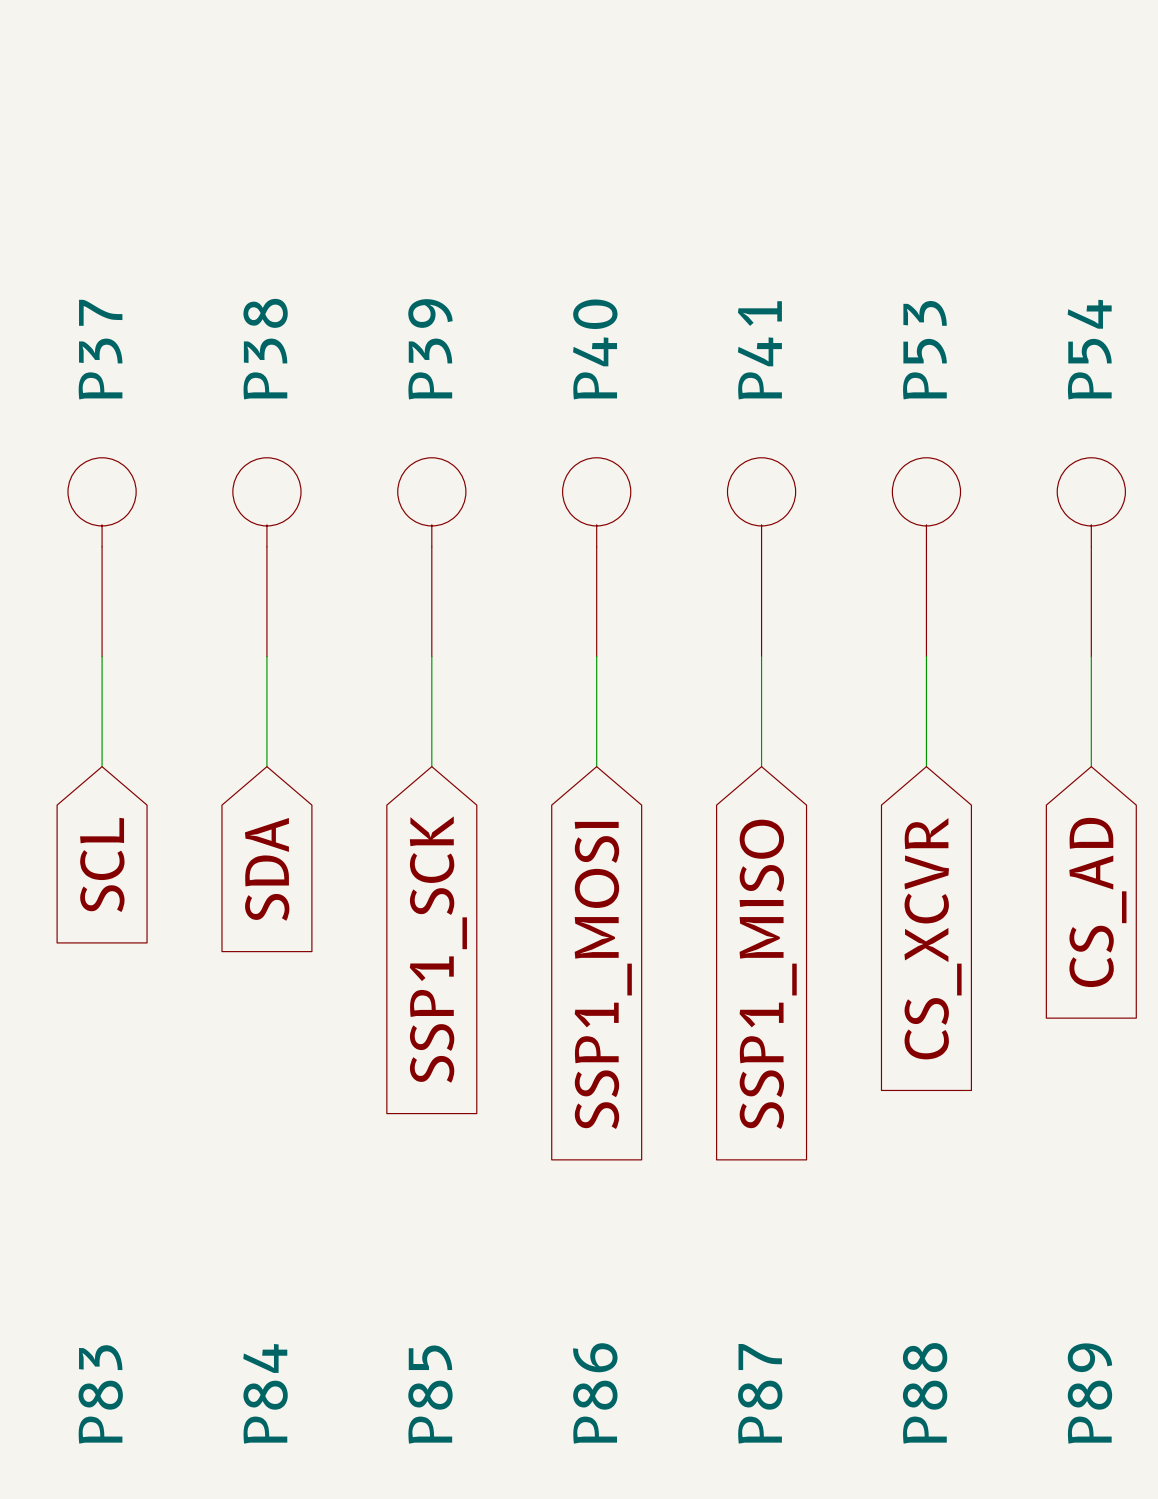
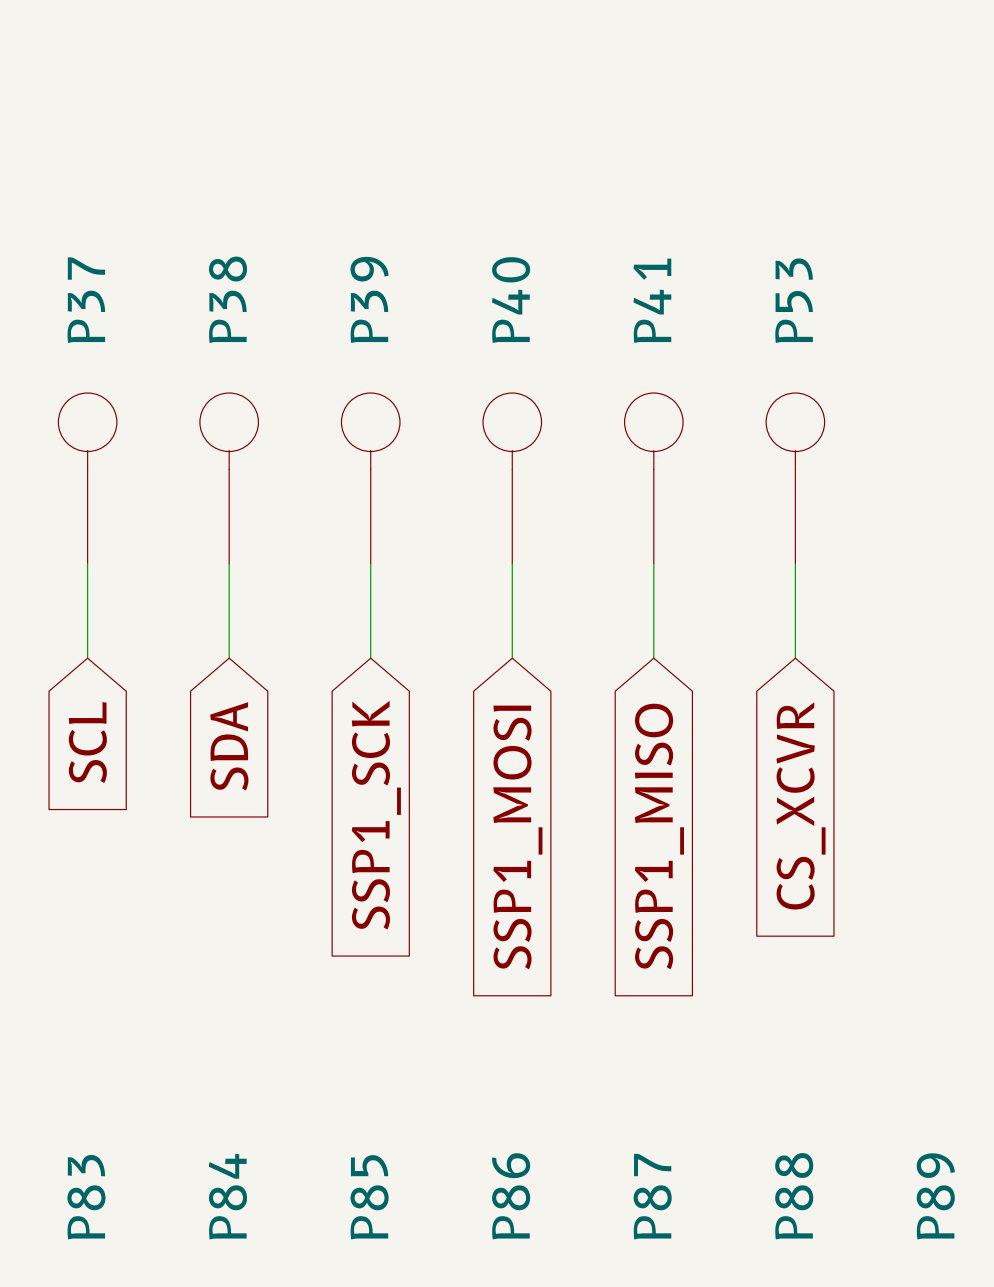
P54: (1091, 557) -> none
wire: (1091, 656) (1091, 766) -> none
global label: CS_AD (1097, 902) -> none

